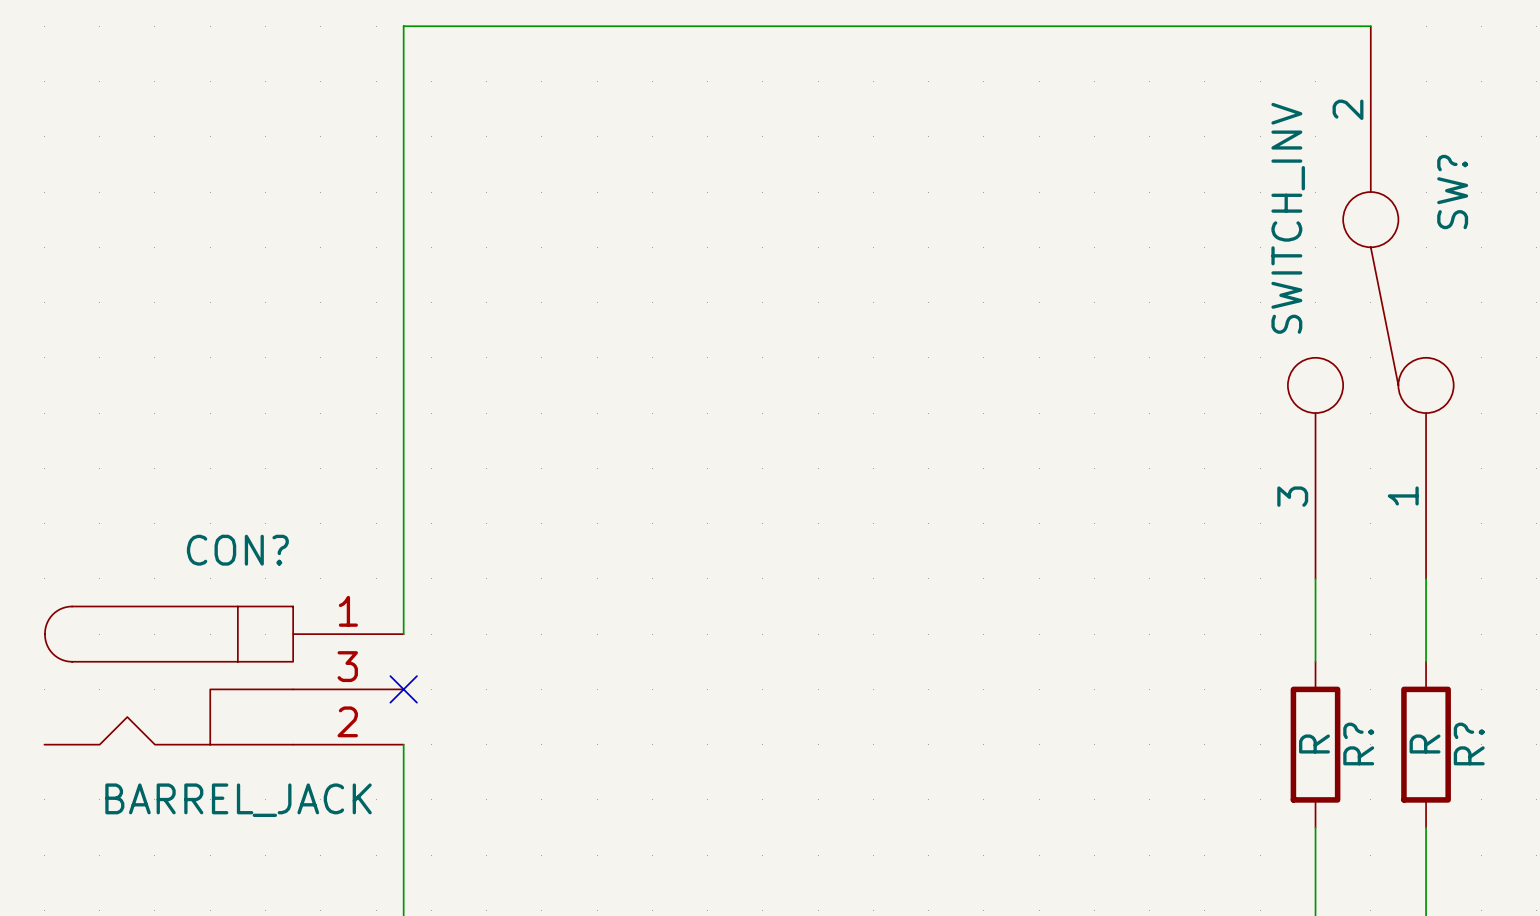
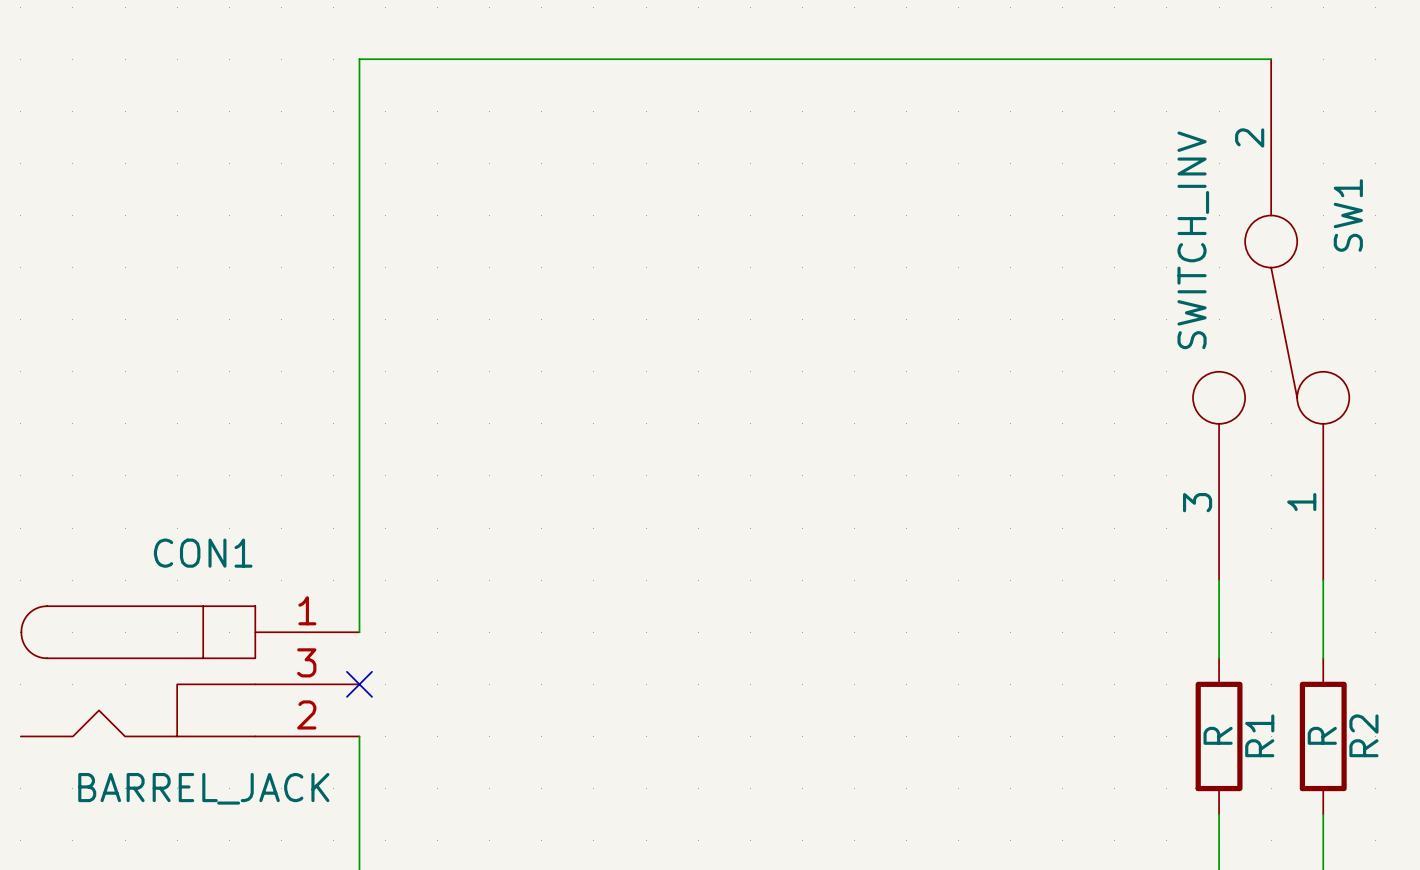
SW? name: SW? (1452, 192) -> SW1 (1348, 215)
CON? name: CON? (237, 550) -> CON1 (203, 553)
R? name: R? (1358, 744) -> R1 (1259, 735)
R? name: R? (1469, 744) -> R2 (1363, 735)

